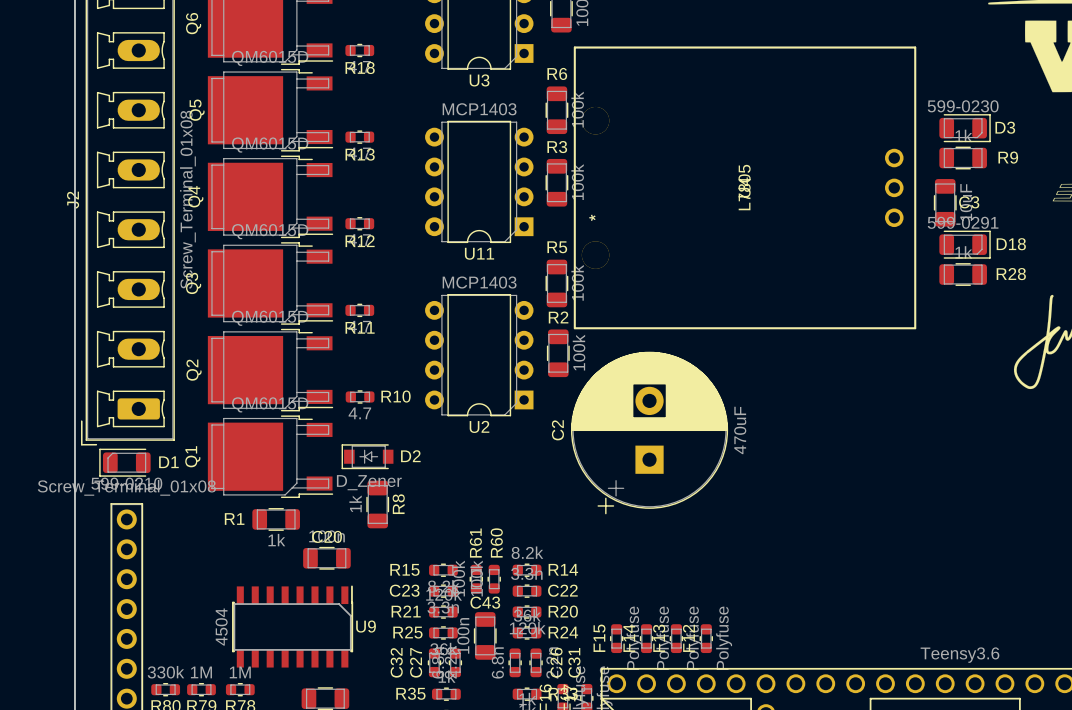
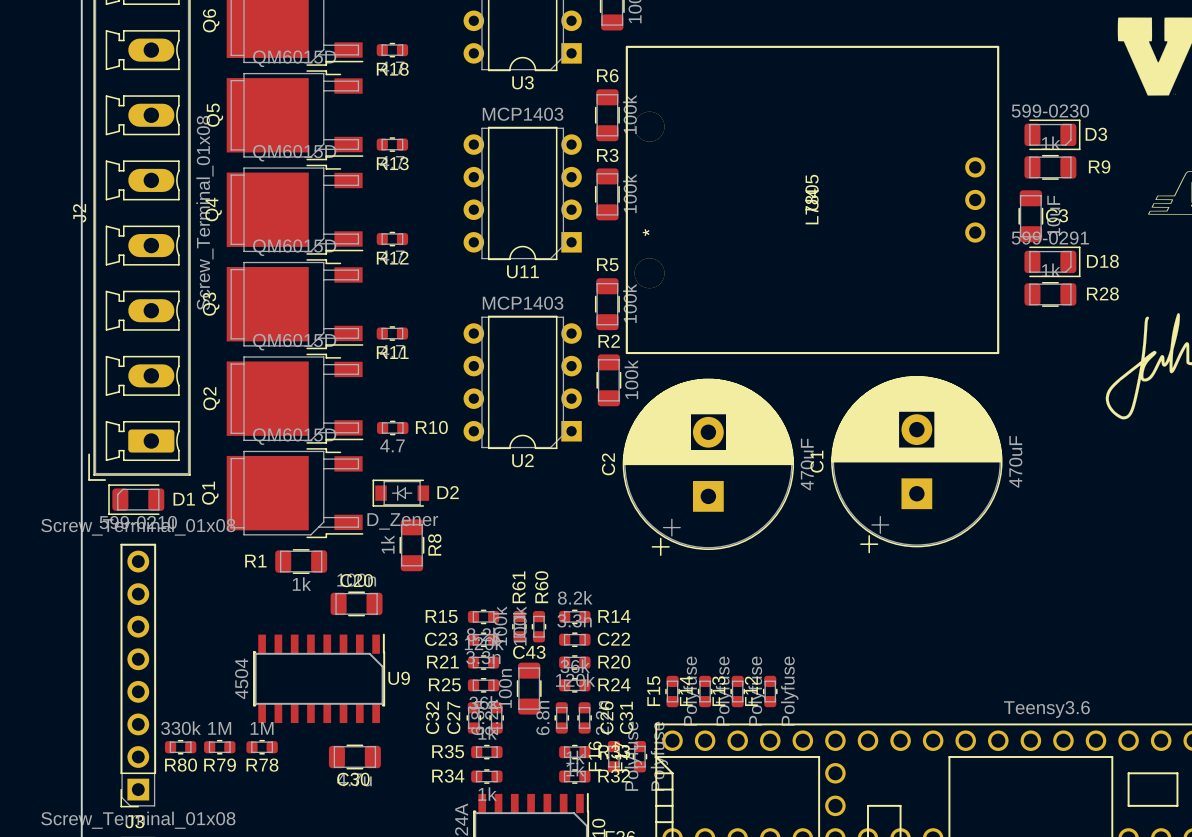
C1: none -> 470uF (916, 464)

